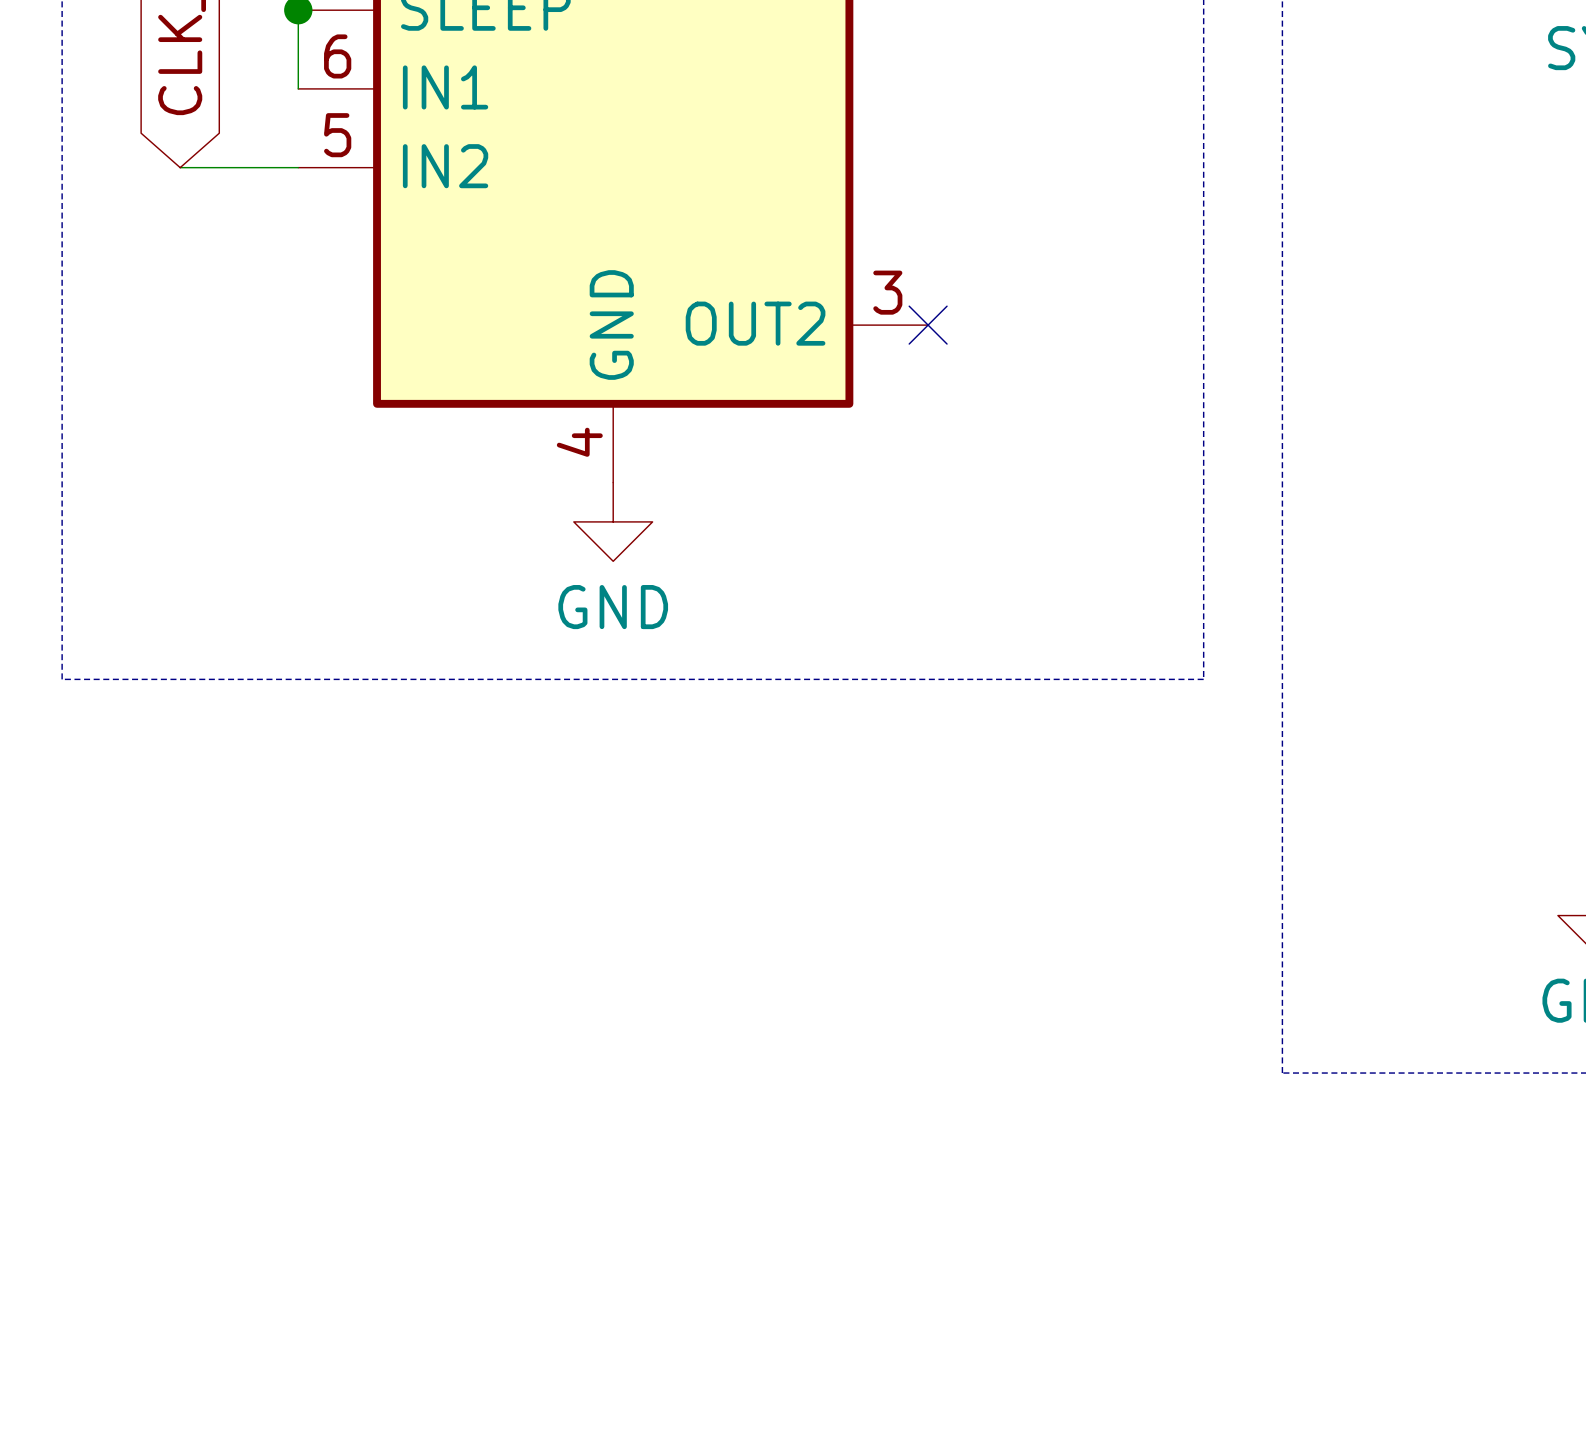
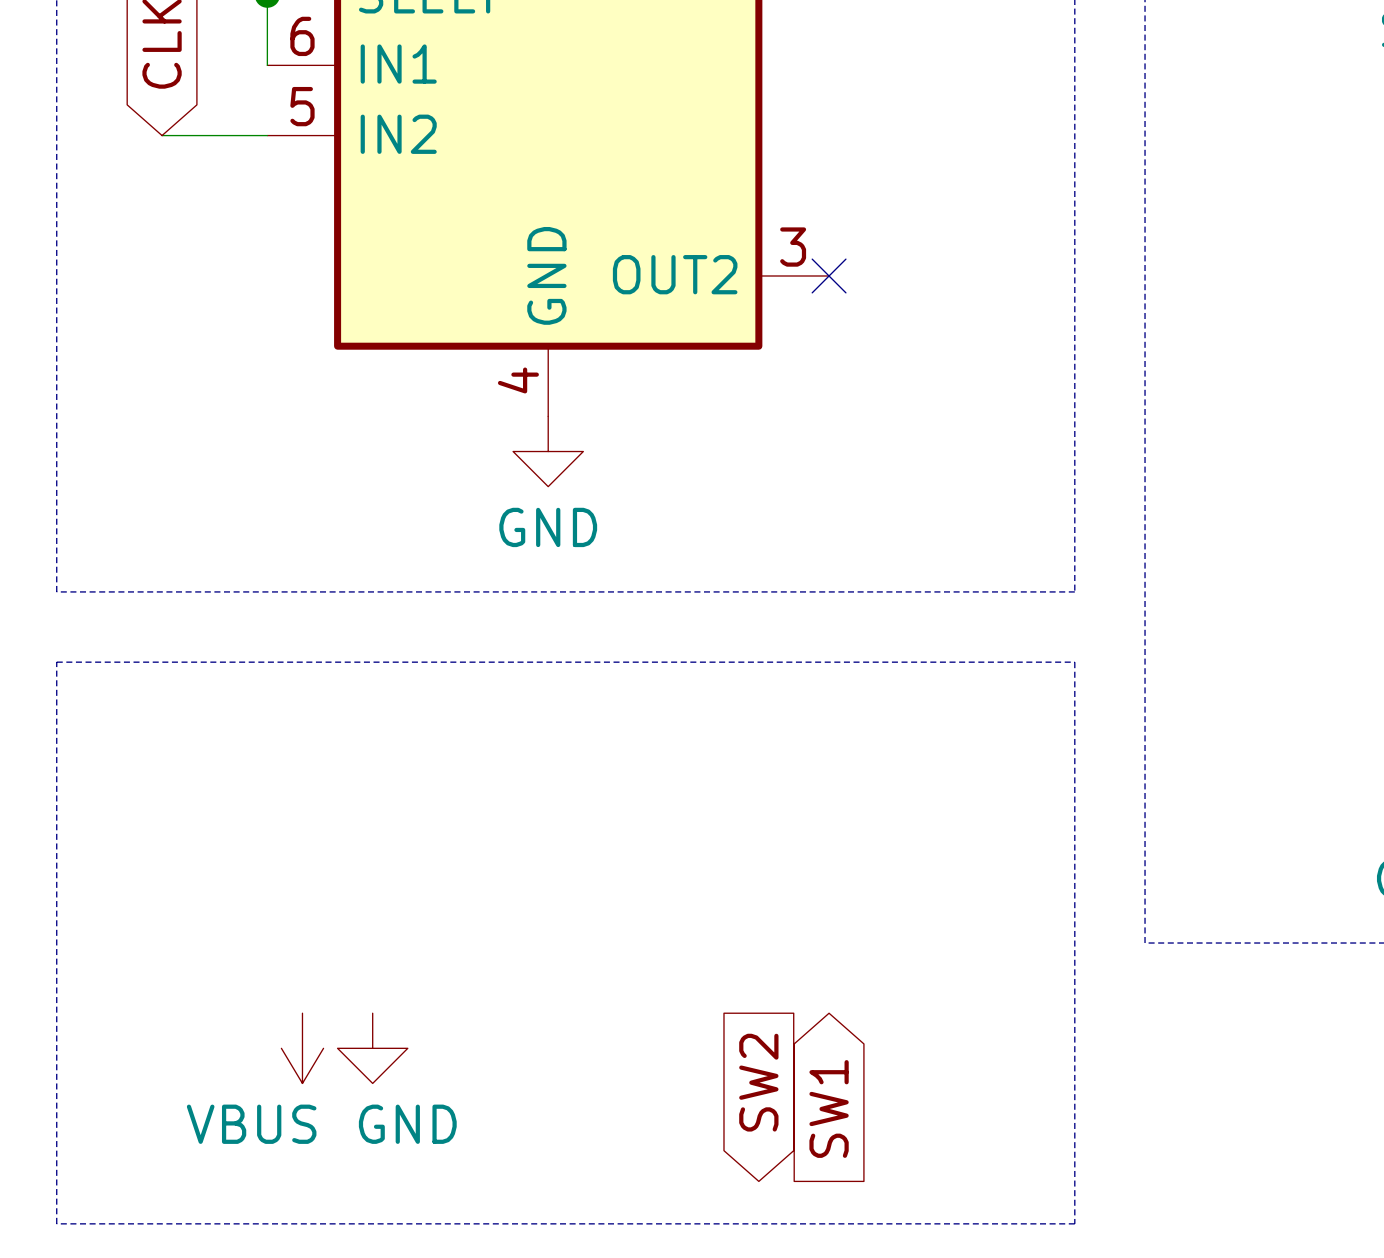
line: none -> (56, 662) (1074, 662) (1074, 1223) (56, 1223) (56, 662)
power symbol: none -> VBUS (302, 1048)
power symbol: none -> GND (372, 1048)
global label: none -> SW2 (758, 1082)
global label: none -> SW1 (829, 1108)

